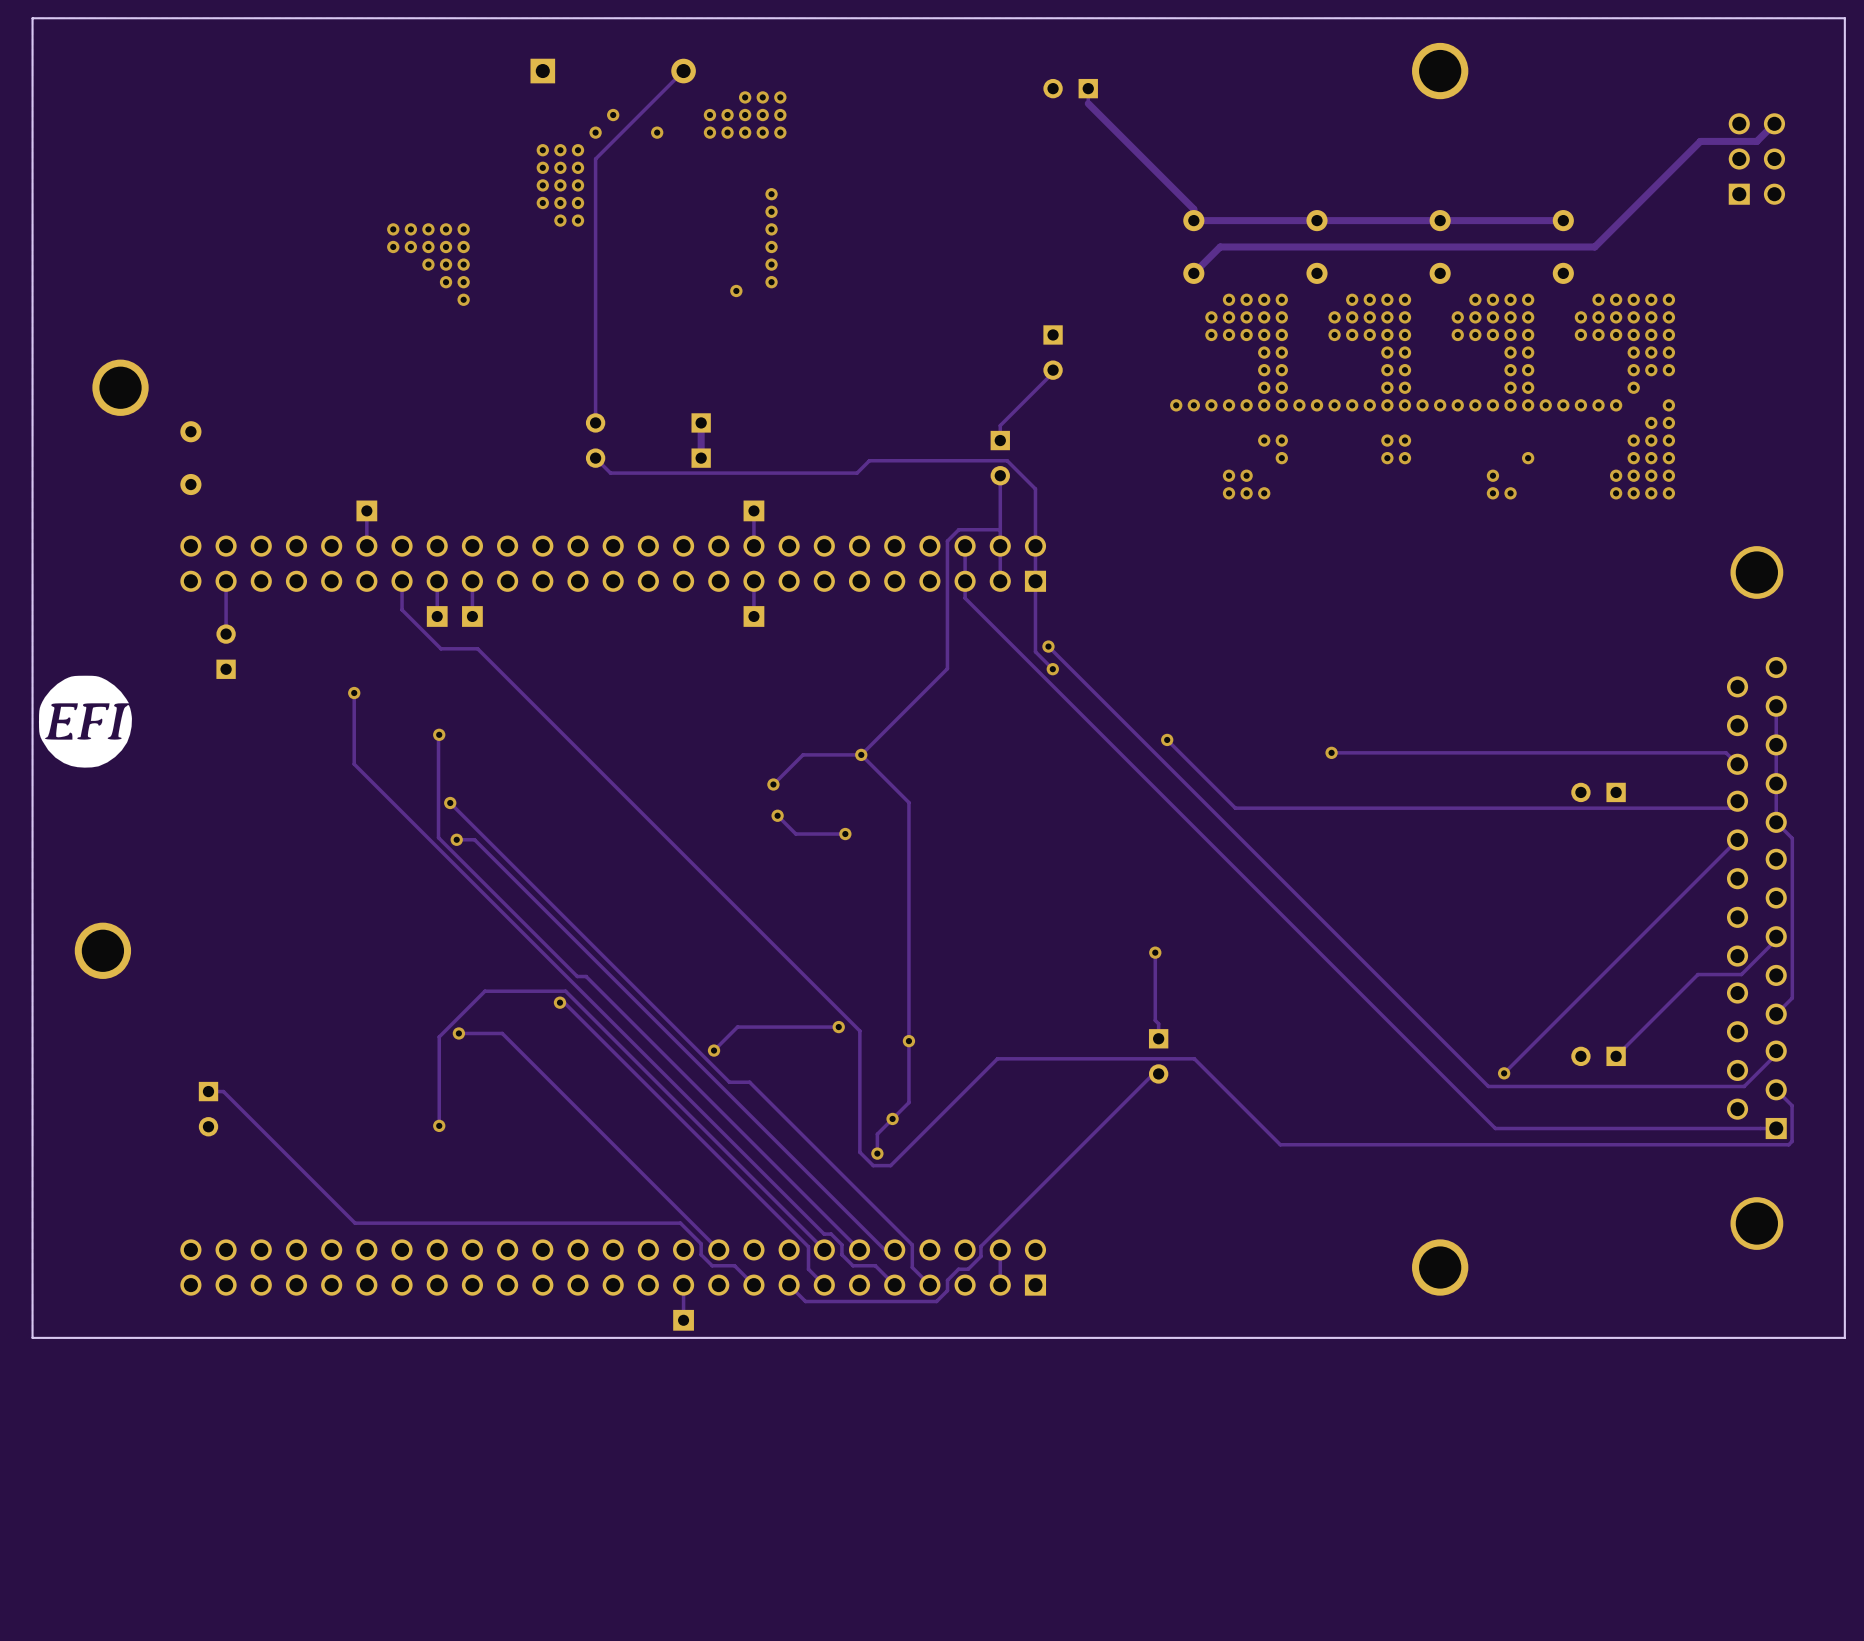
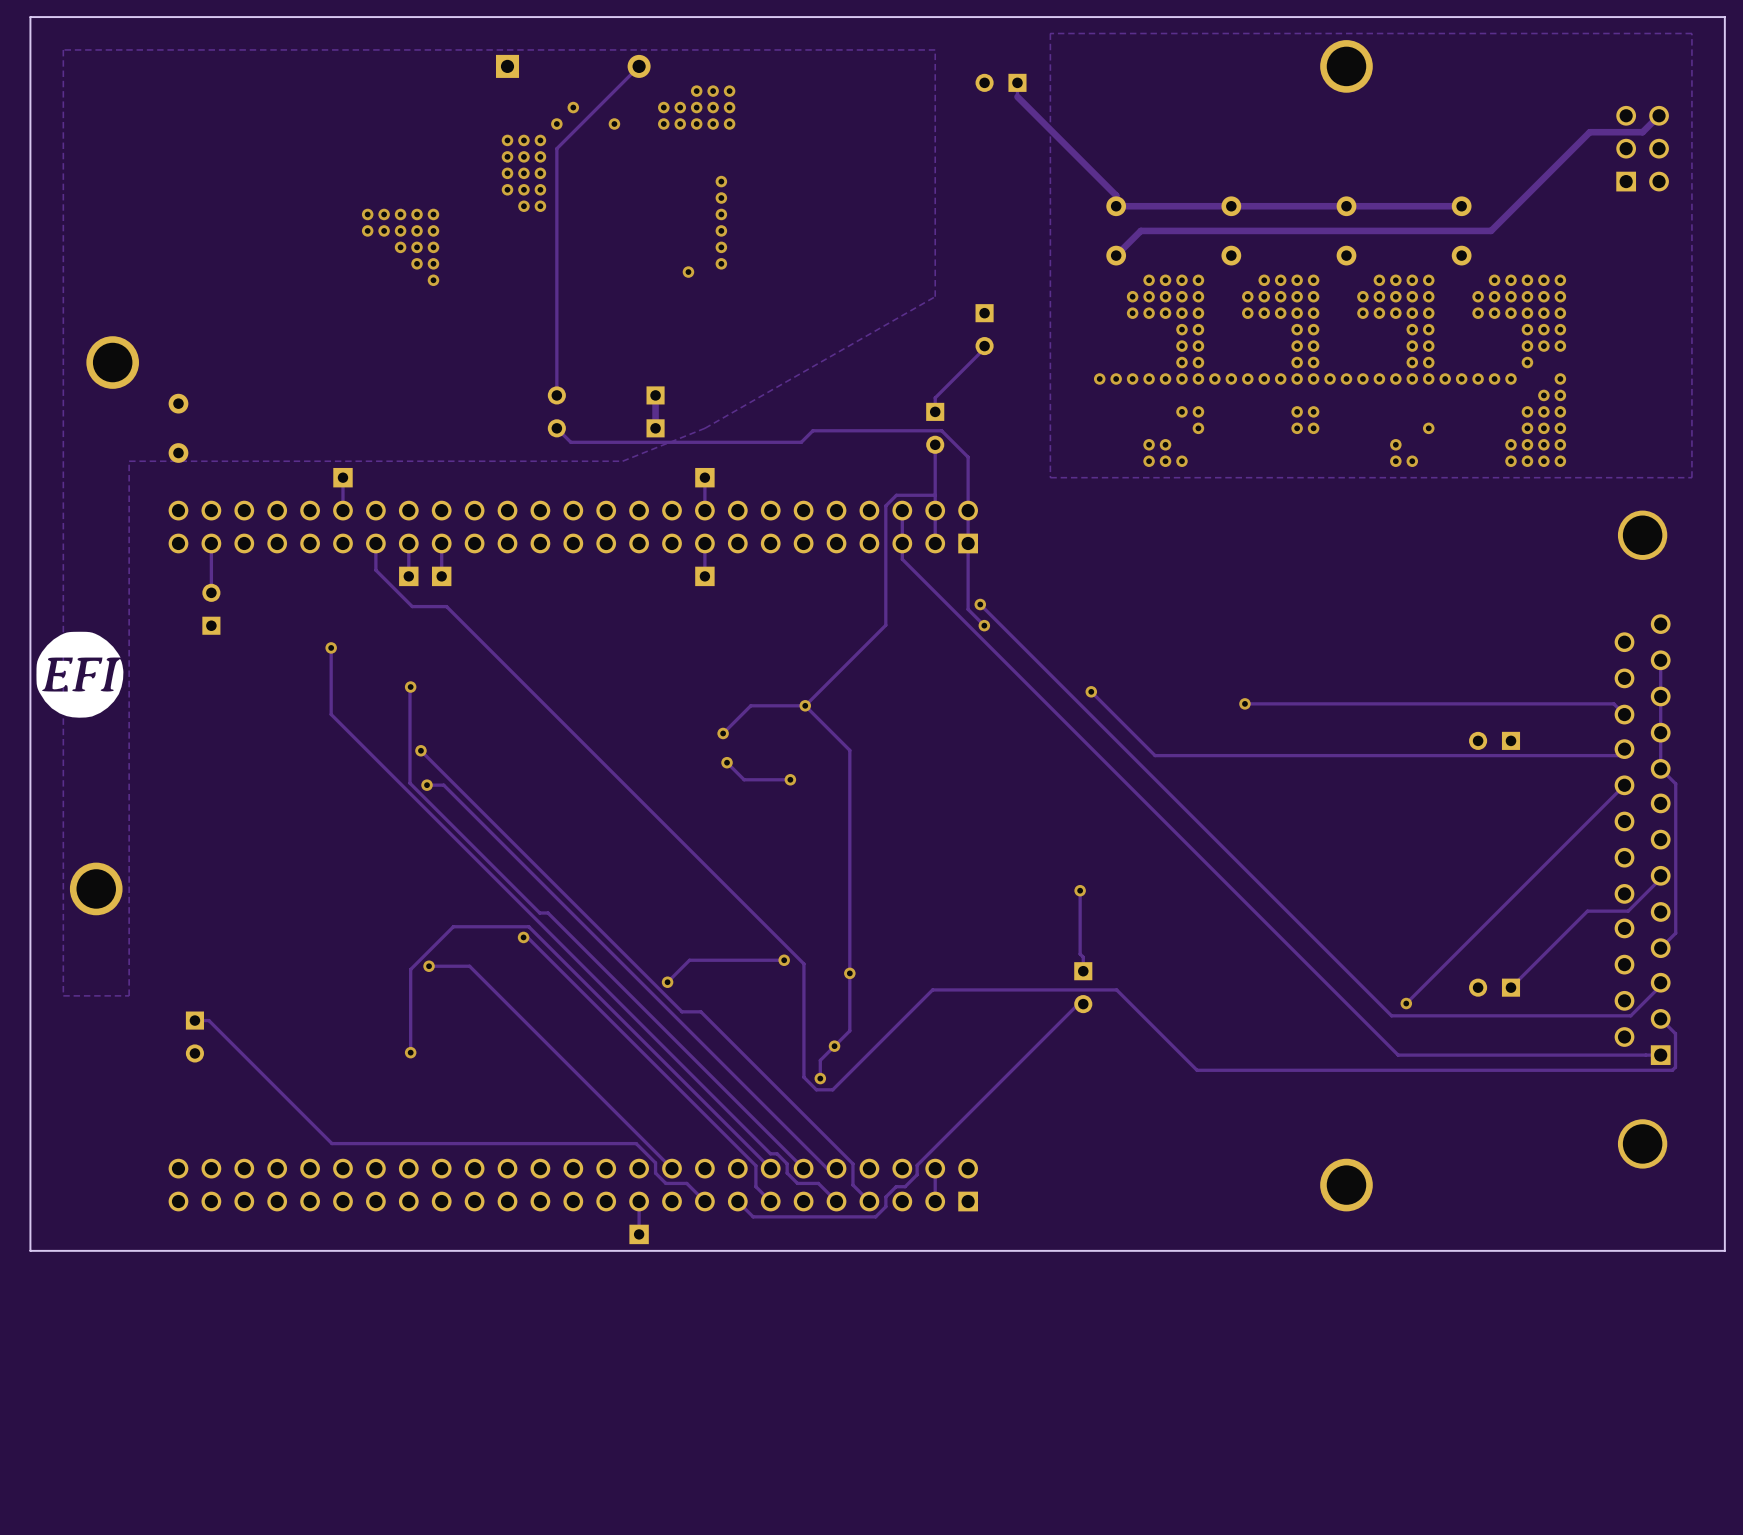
zone outline: none -> (1691, 33) (1691, 477) (1050, 477) (1050, 33) (1691, 33)
zone outline: none -> (935, 49) (935, 296) (704, 428) (622, 461) (129, 461) (129, 995) (63, 995) (63, 49) (935, 49)

